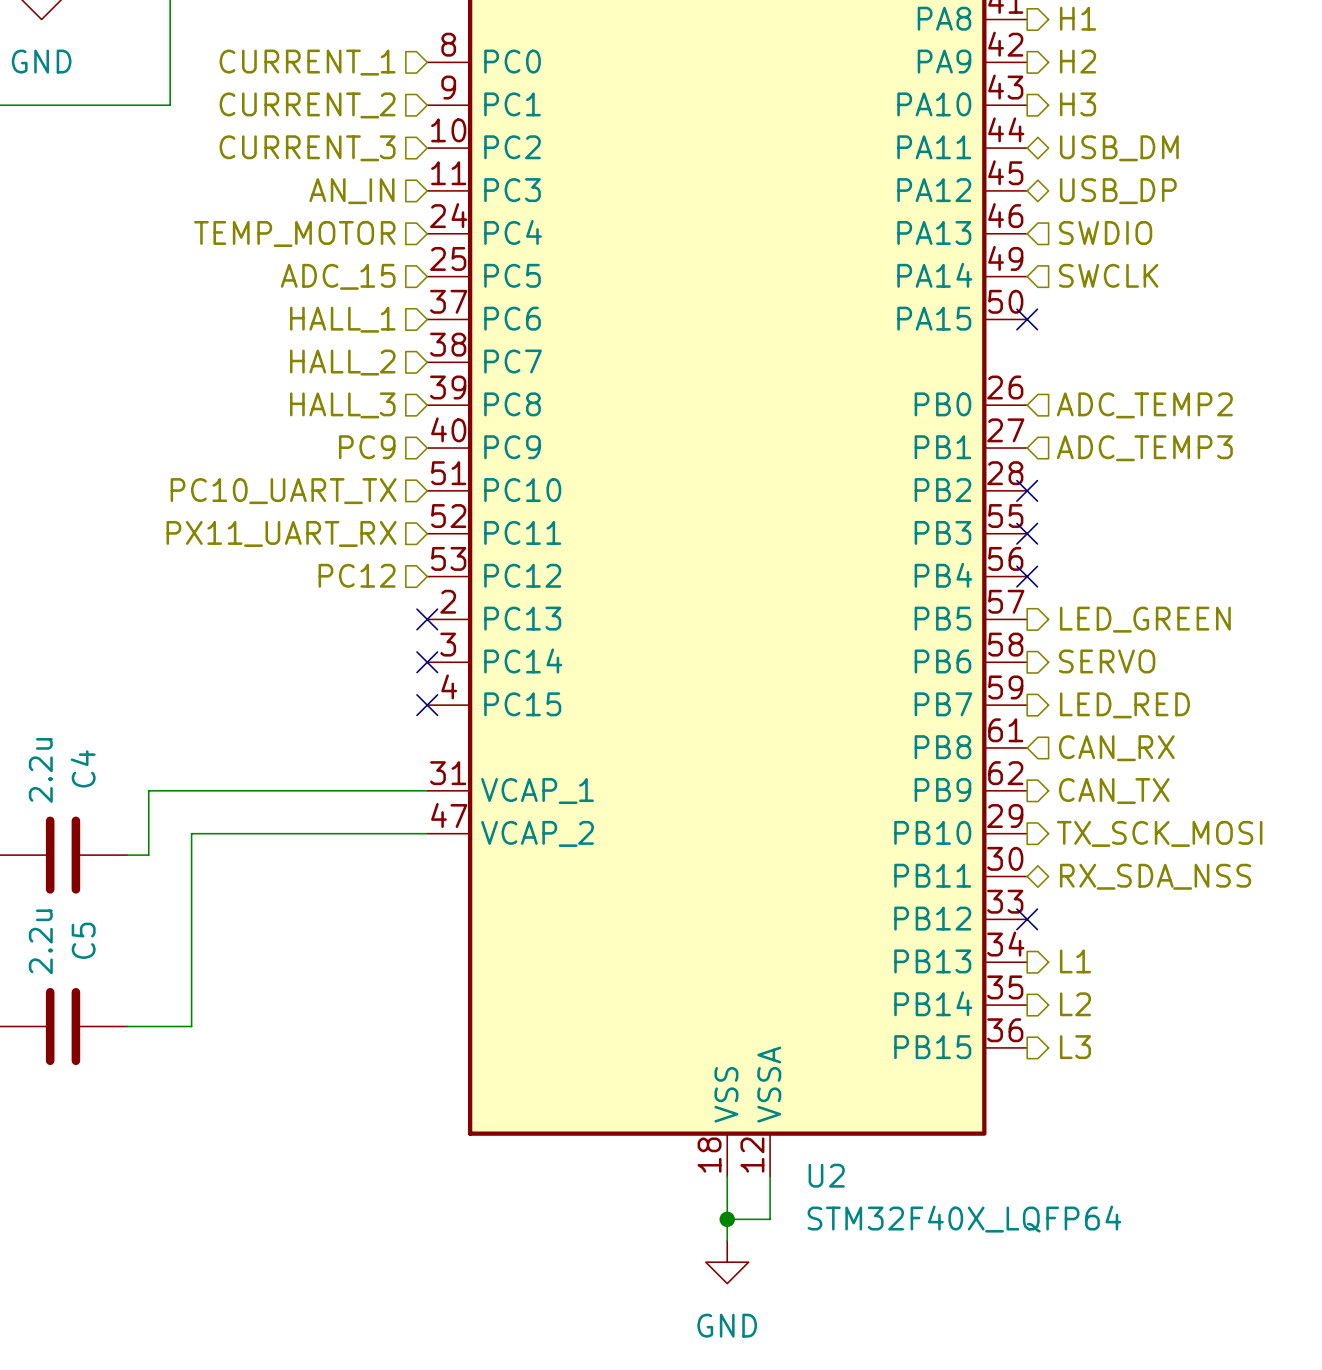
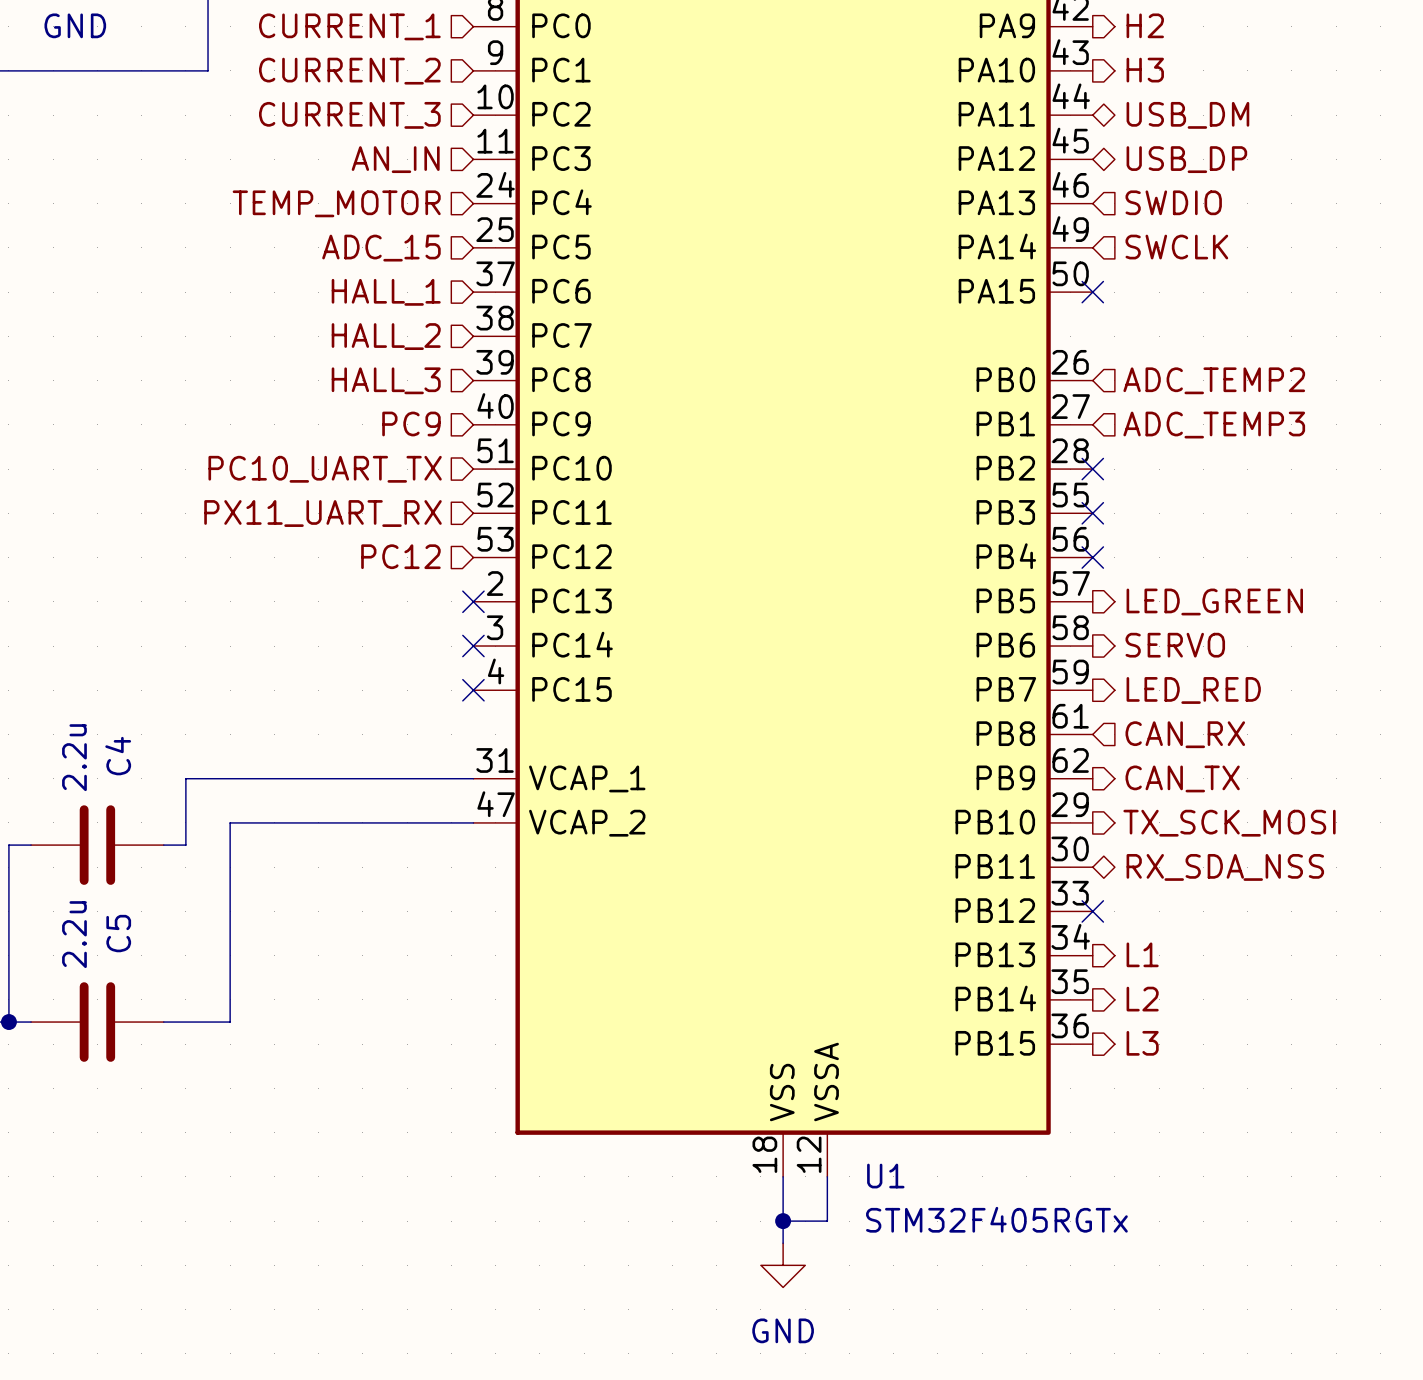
U2 name: U2 (826, 1175) -> U1 (885, 1176)
U2 value: STM32F40X_LQFP64 (964, 1219) -> STM32F405RGTx (996, 1219)

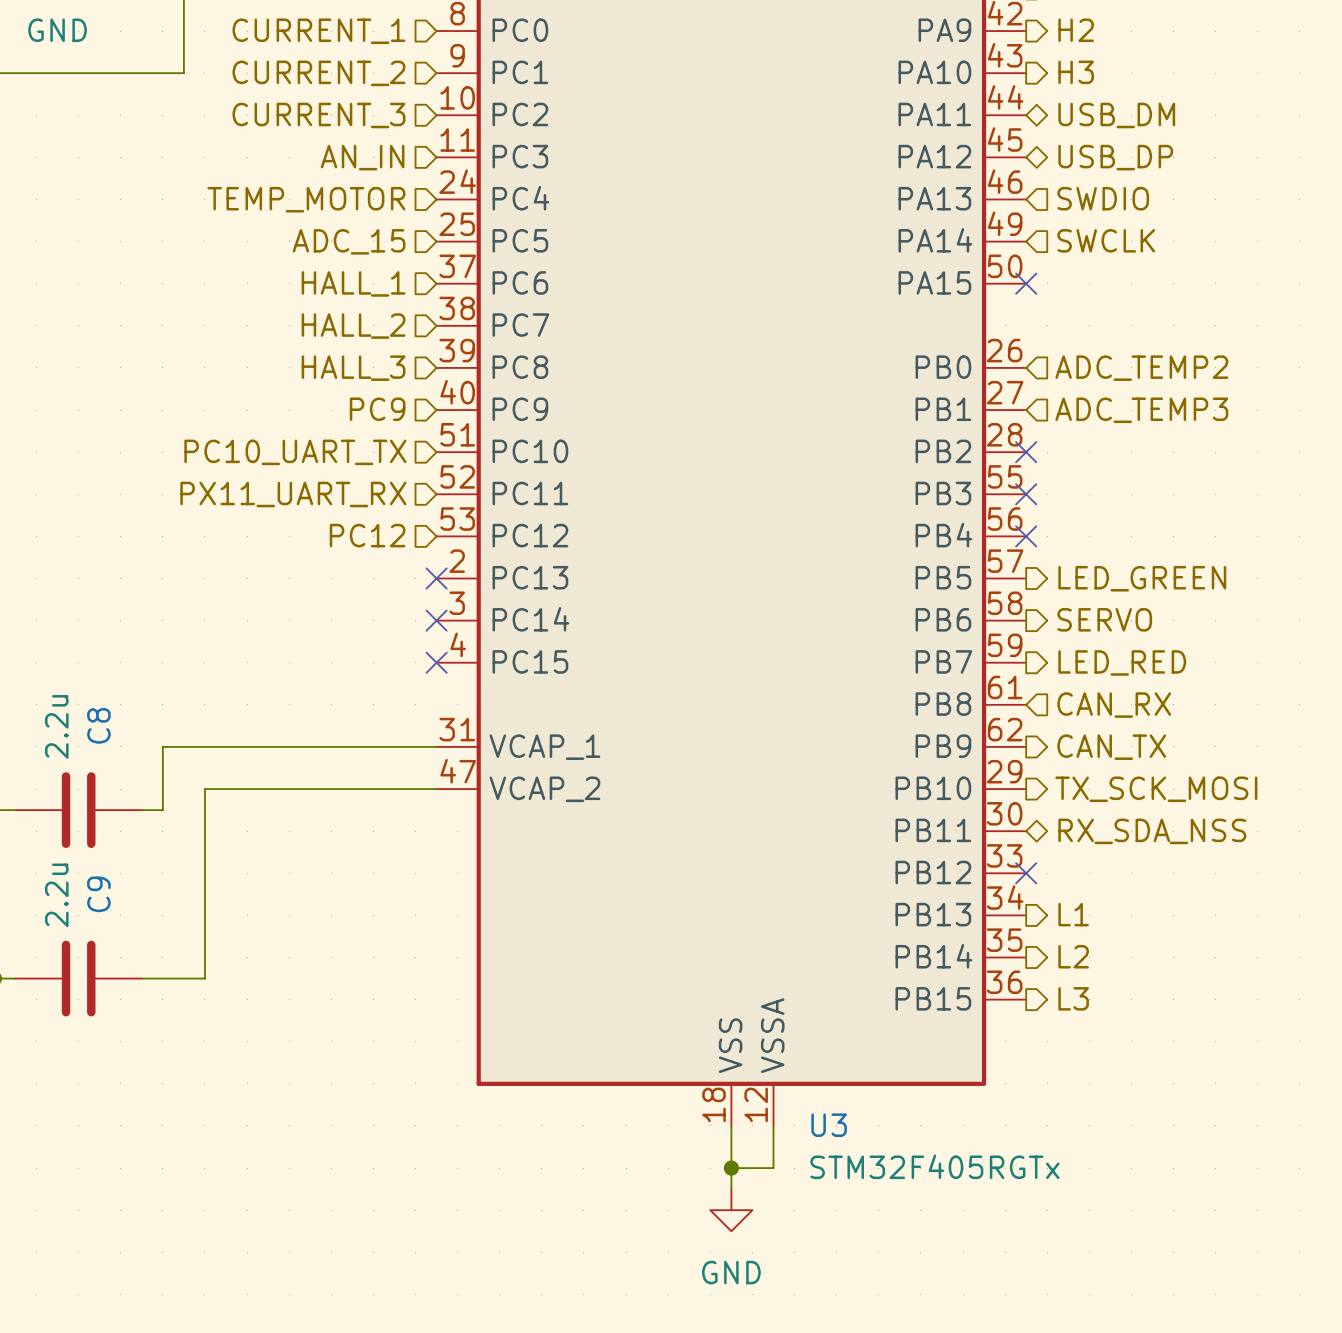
C4 name: C4 (118, 756) -> C8 (98, 725)
C5 name: C5 (118, 933) -> C9 (98, 894)
U1 name: U1 (885, 1176) -> U3 (829, 1125)

